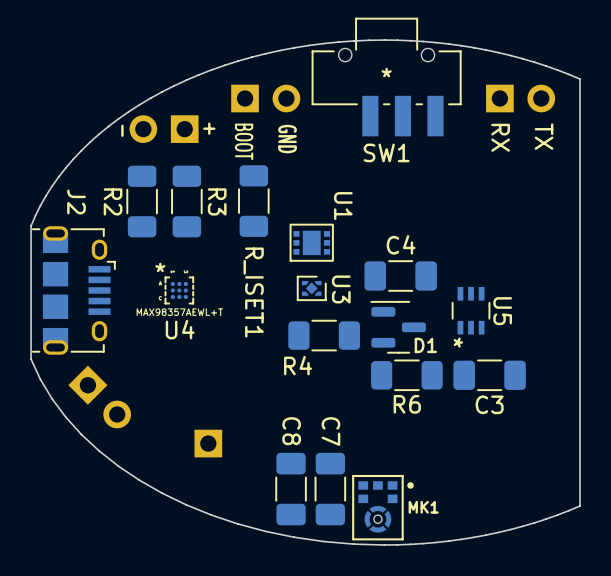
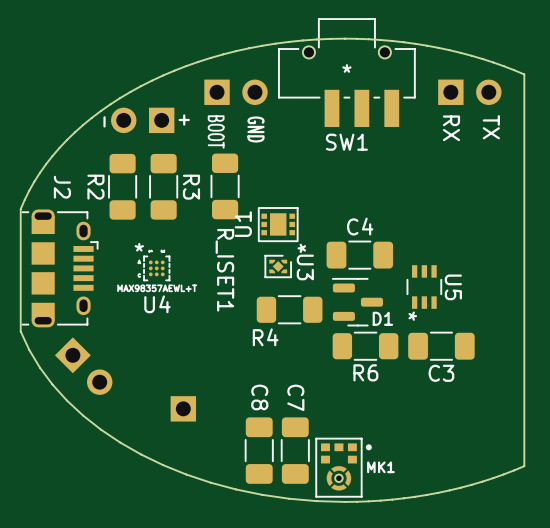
U1 name rotation: 0° (343, 206) -> 180° (243, 224)
U1 name position: U1 (343, 206) -> U1 (243, 224)
U1 text: none -> * (301, 248)

